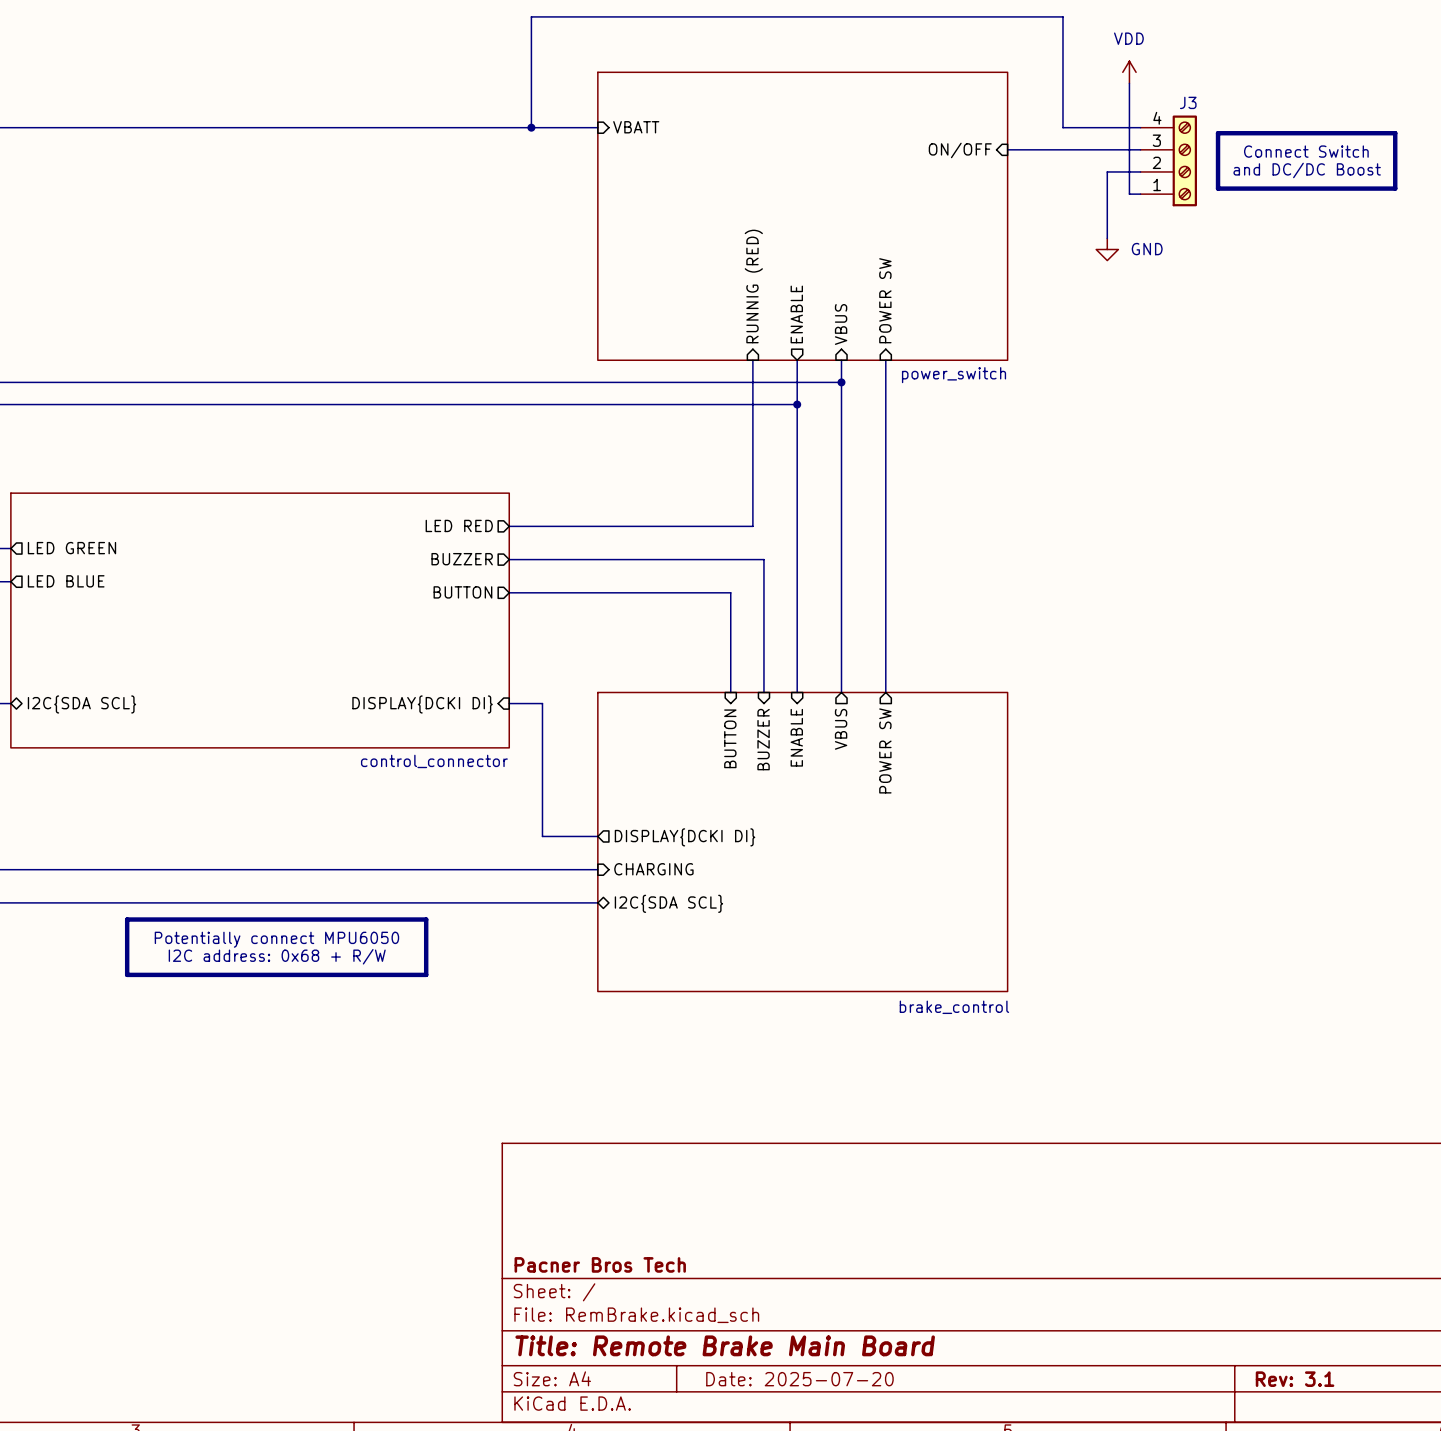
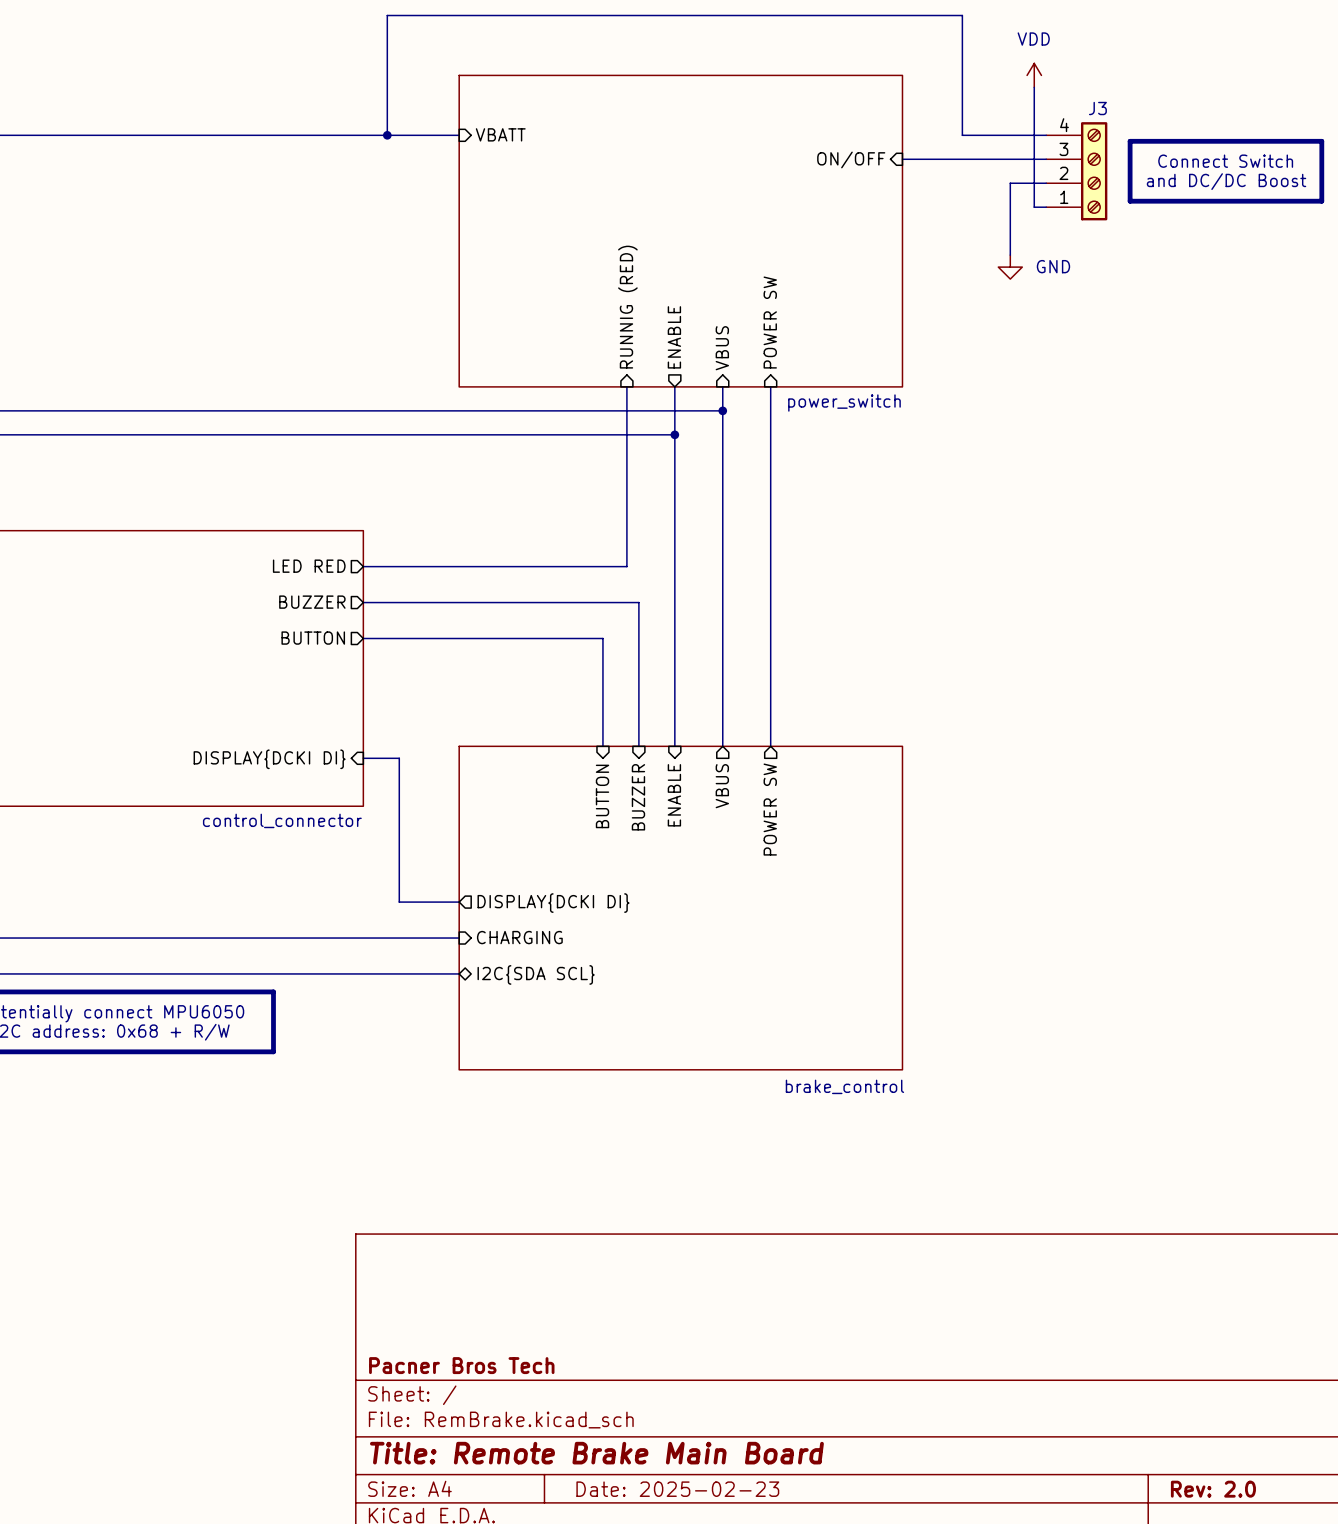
title block: Date: 2025-07-20 (799, 1379) -> Date: 2025-02-23 (677, 1489)
title block: Rev: 3.1 (1295, 1379) -> Rev: 2.0 (1213, 1489)

